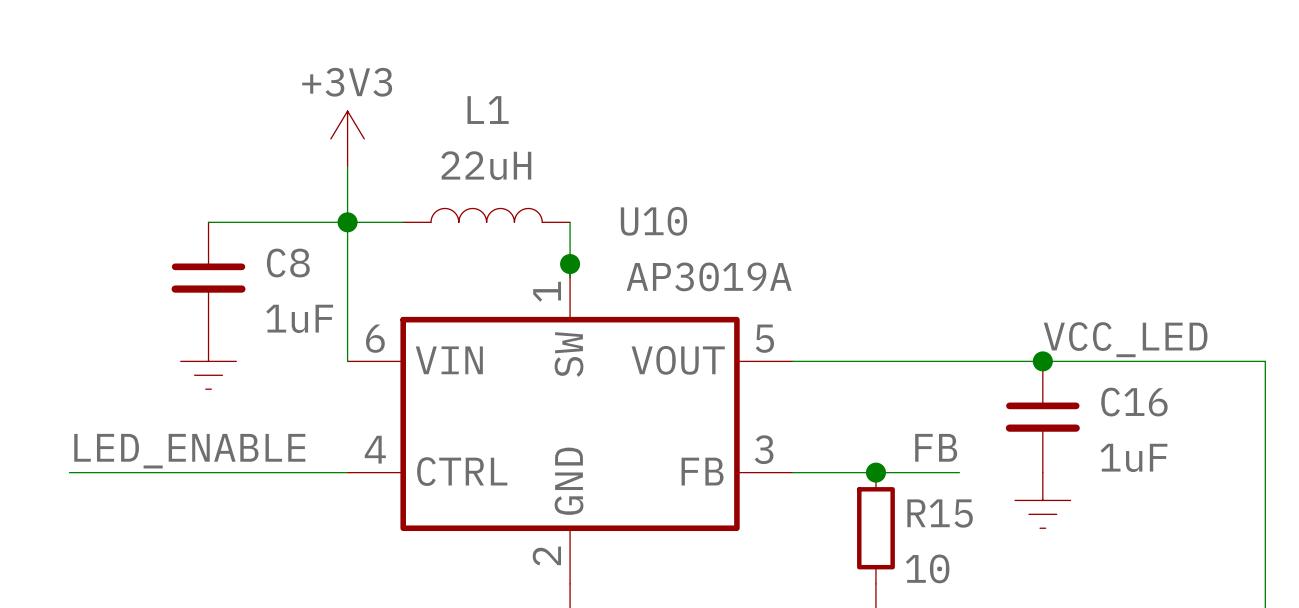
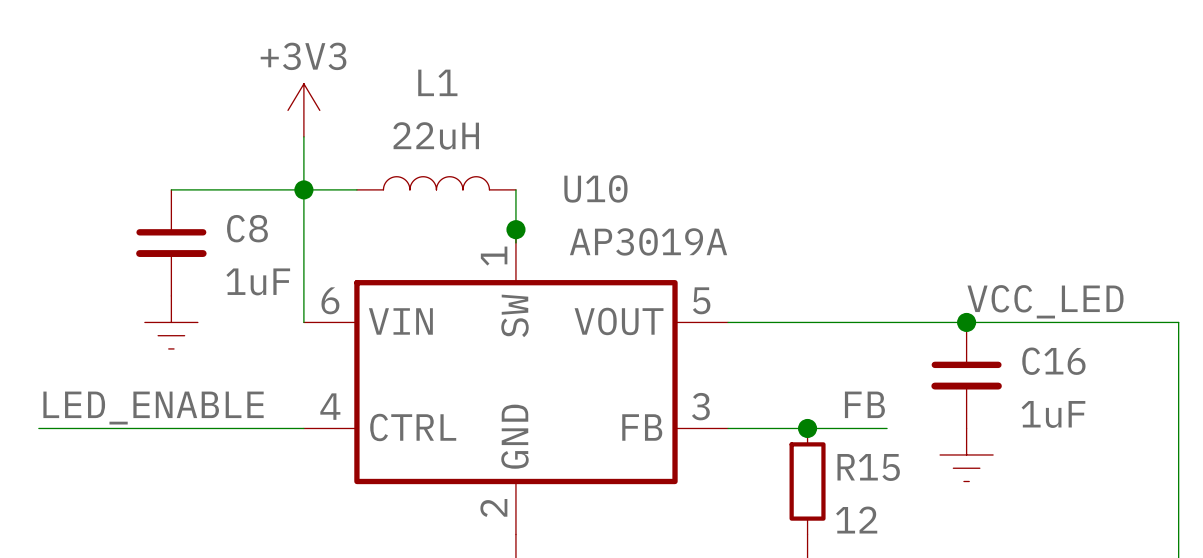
R15 value: 10 (927, 568) -> 12 (856, 520)

